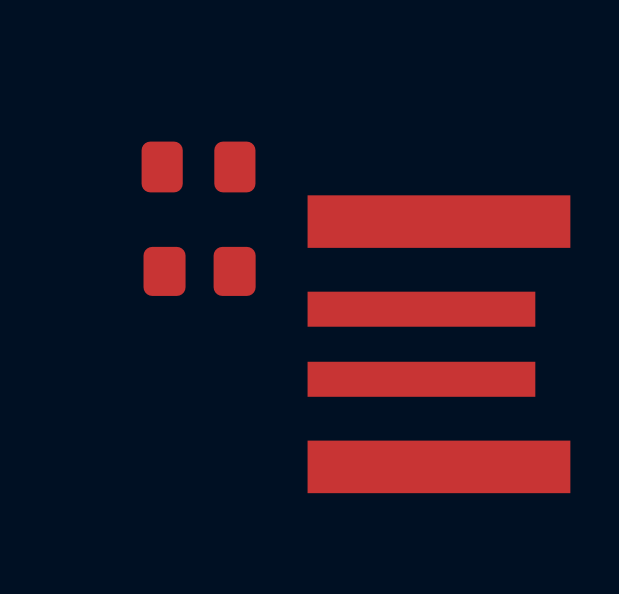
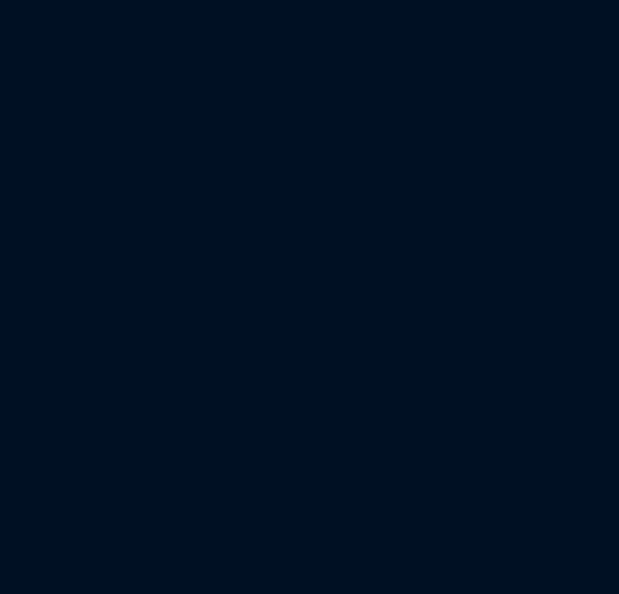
part: (198, 166) -> none
part: (199, 271) -> none
part: (438, 344) -> none

